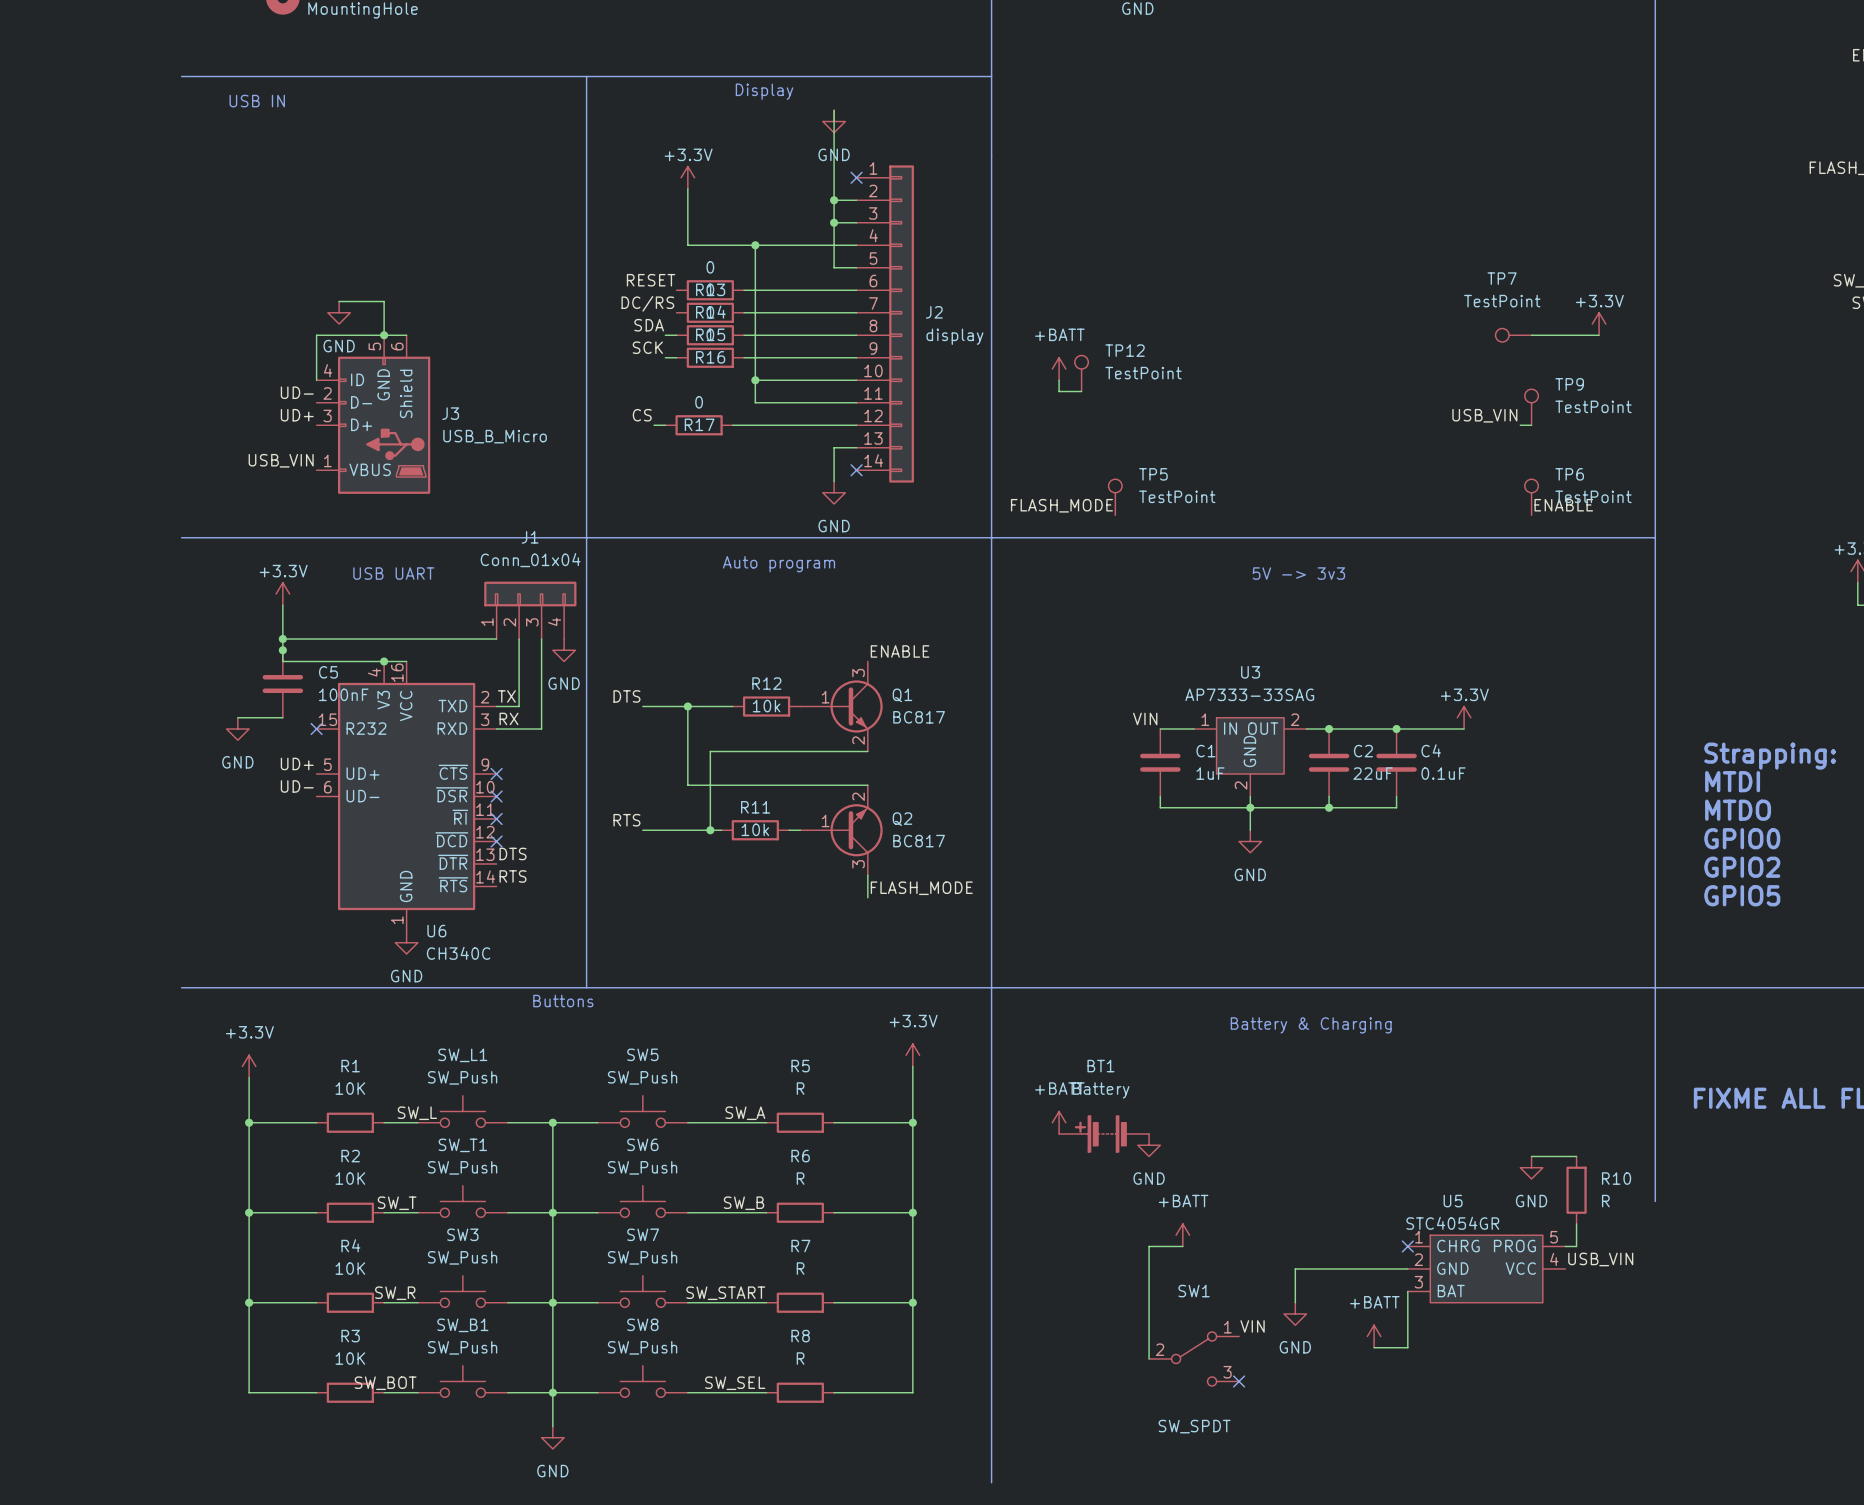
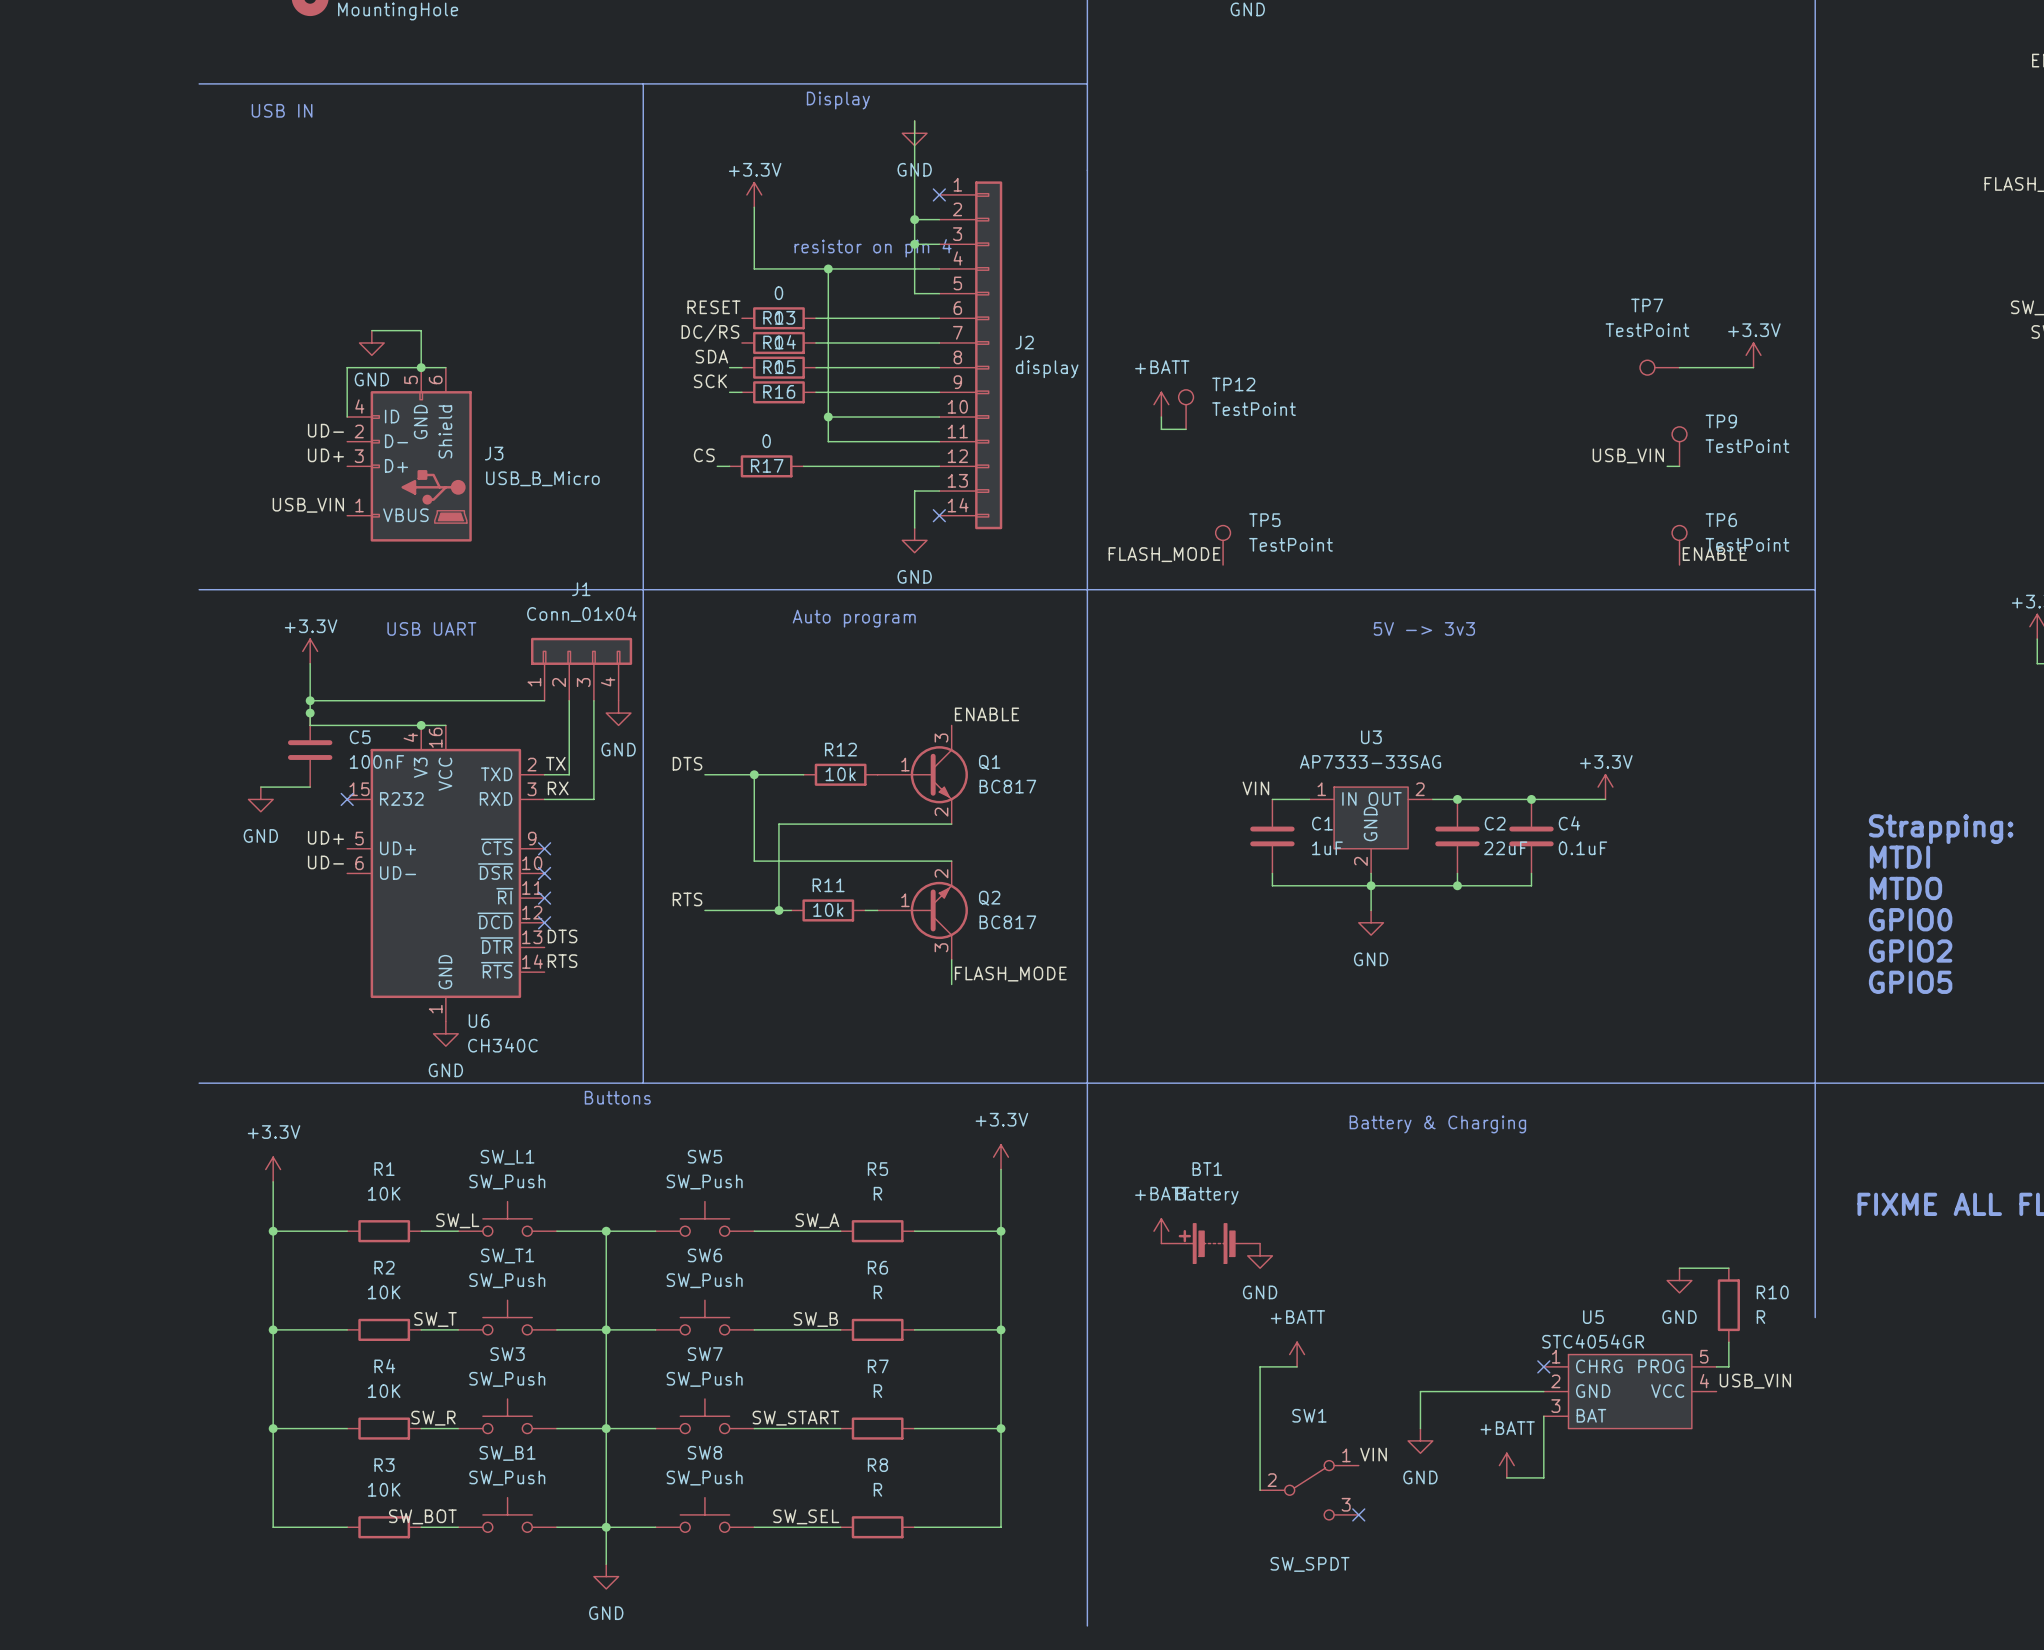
text: none -> resistor on pin 4 (873, 248)

